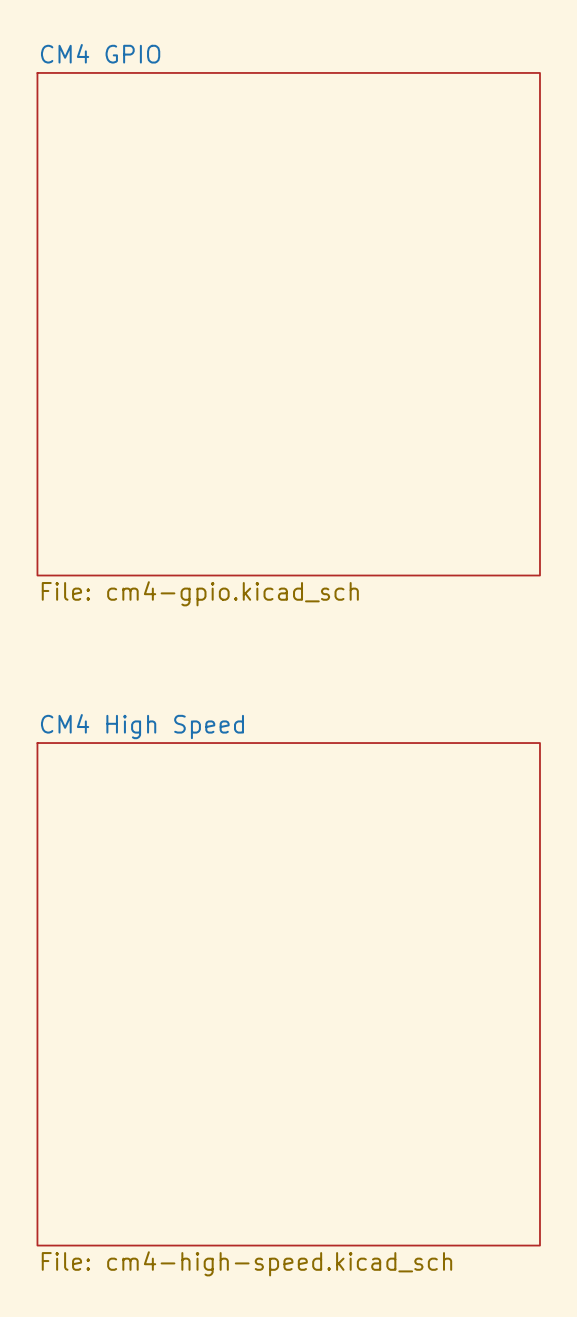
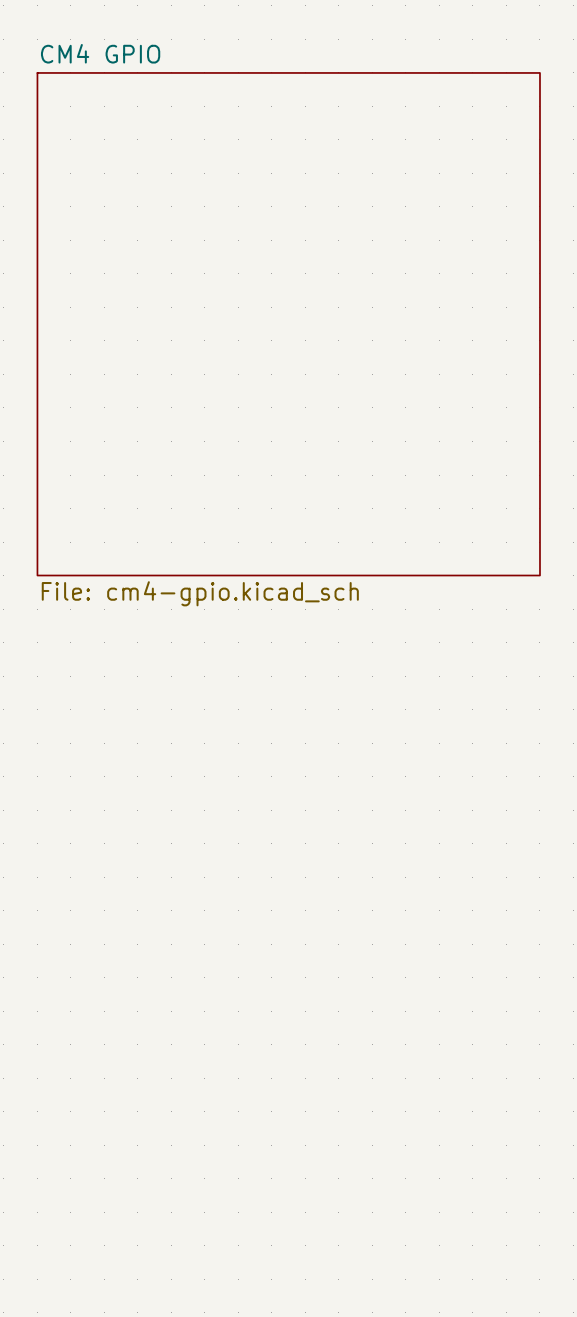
sheet CM4 High Speed: File: cm4-high-speed.kicad_sch (288, 994) -> none

